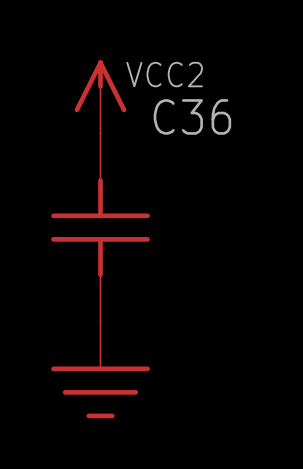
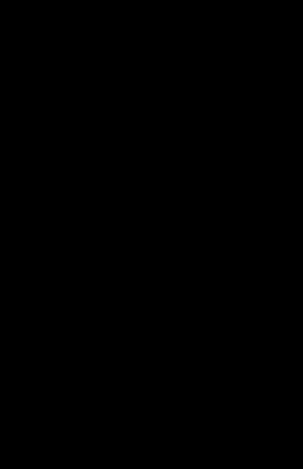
power symbol: VCC2 (100, 96) -> none
C36: (100, 227) -> none
power symbol: (100, 370) -> none

